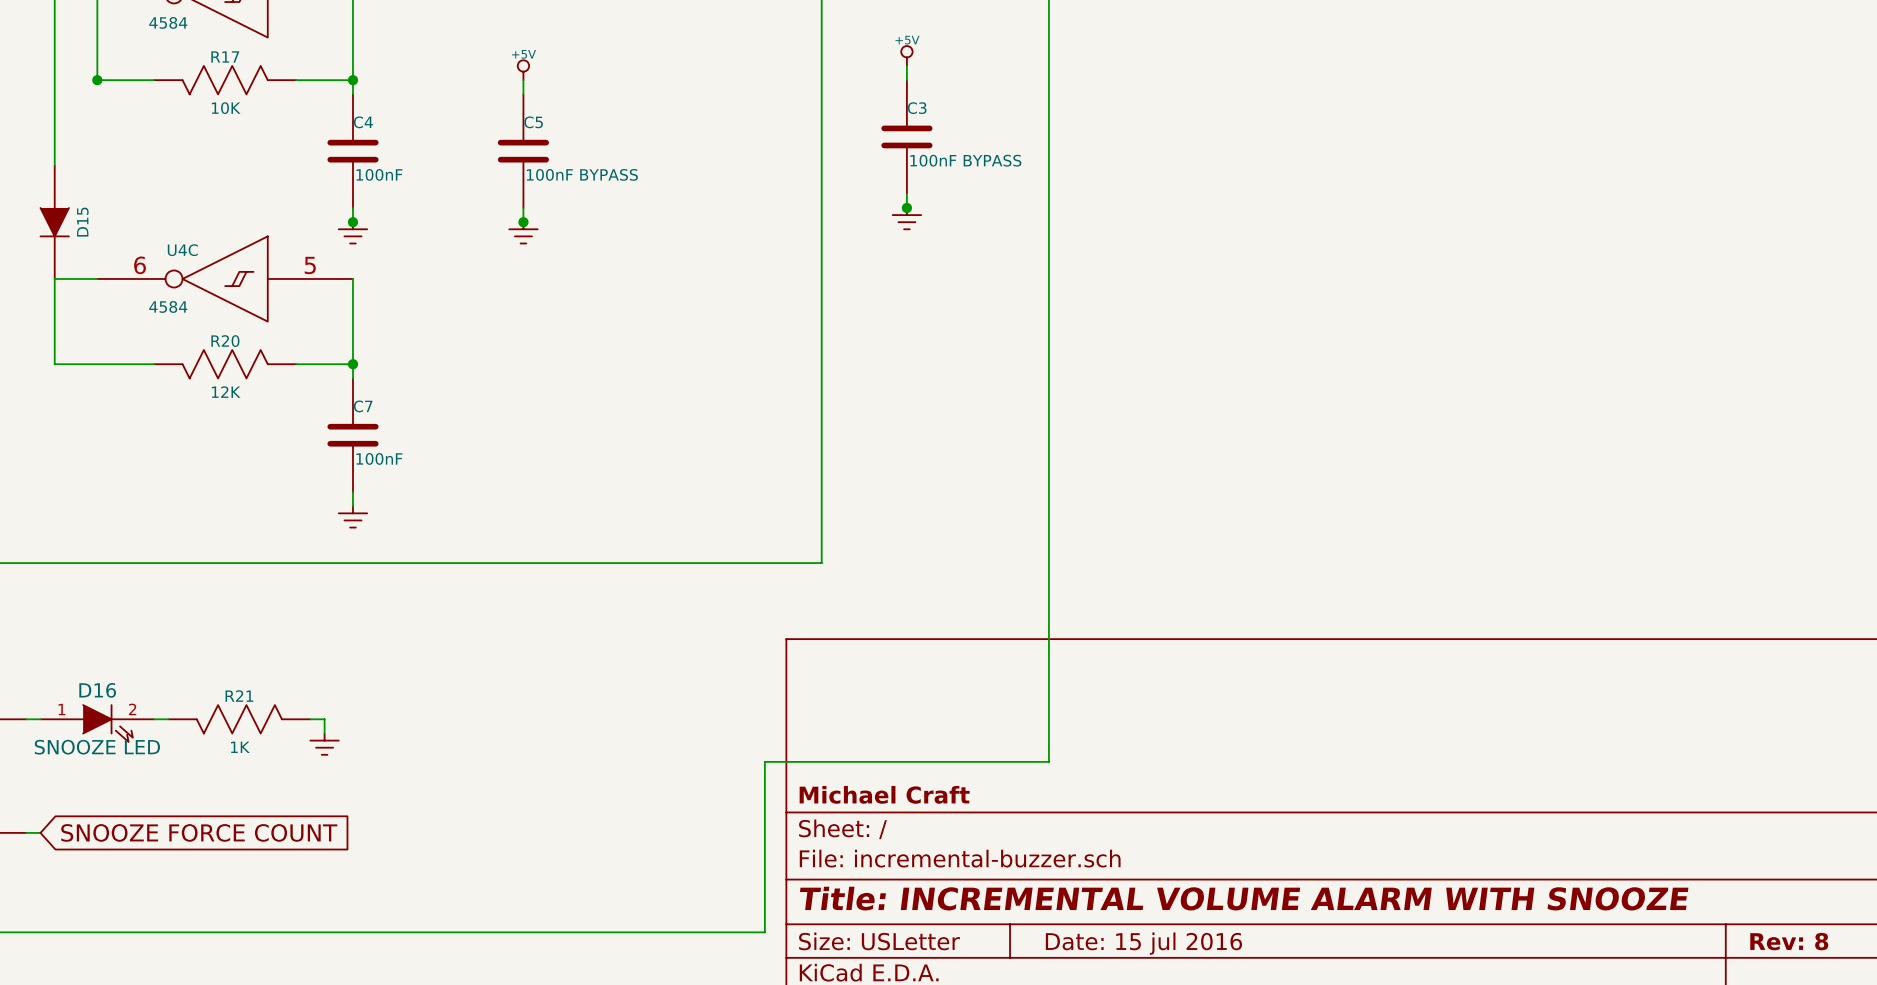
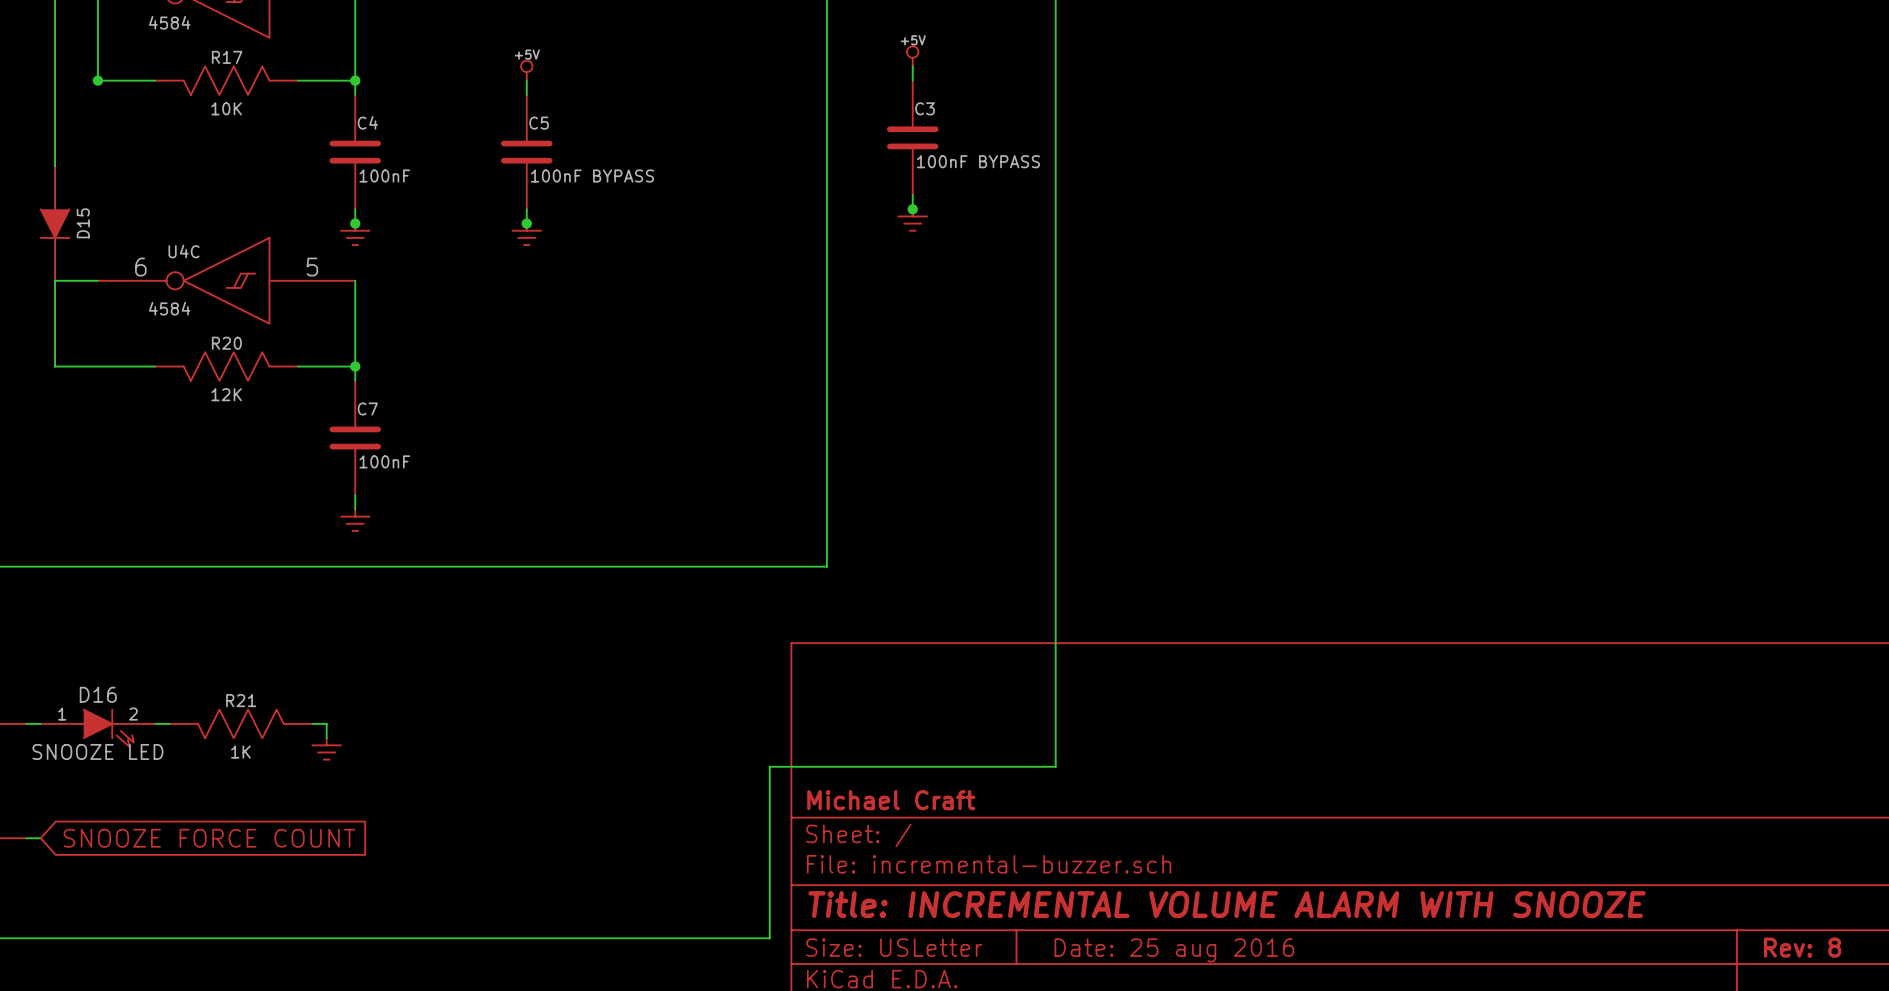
title block: Date: 15 jul 2016 (1143, 943) -> Date: 25 aug 2016 (1174, 950)

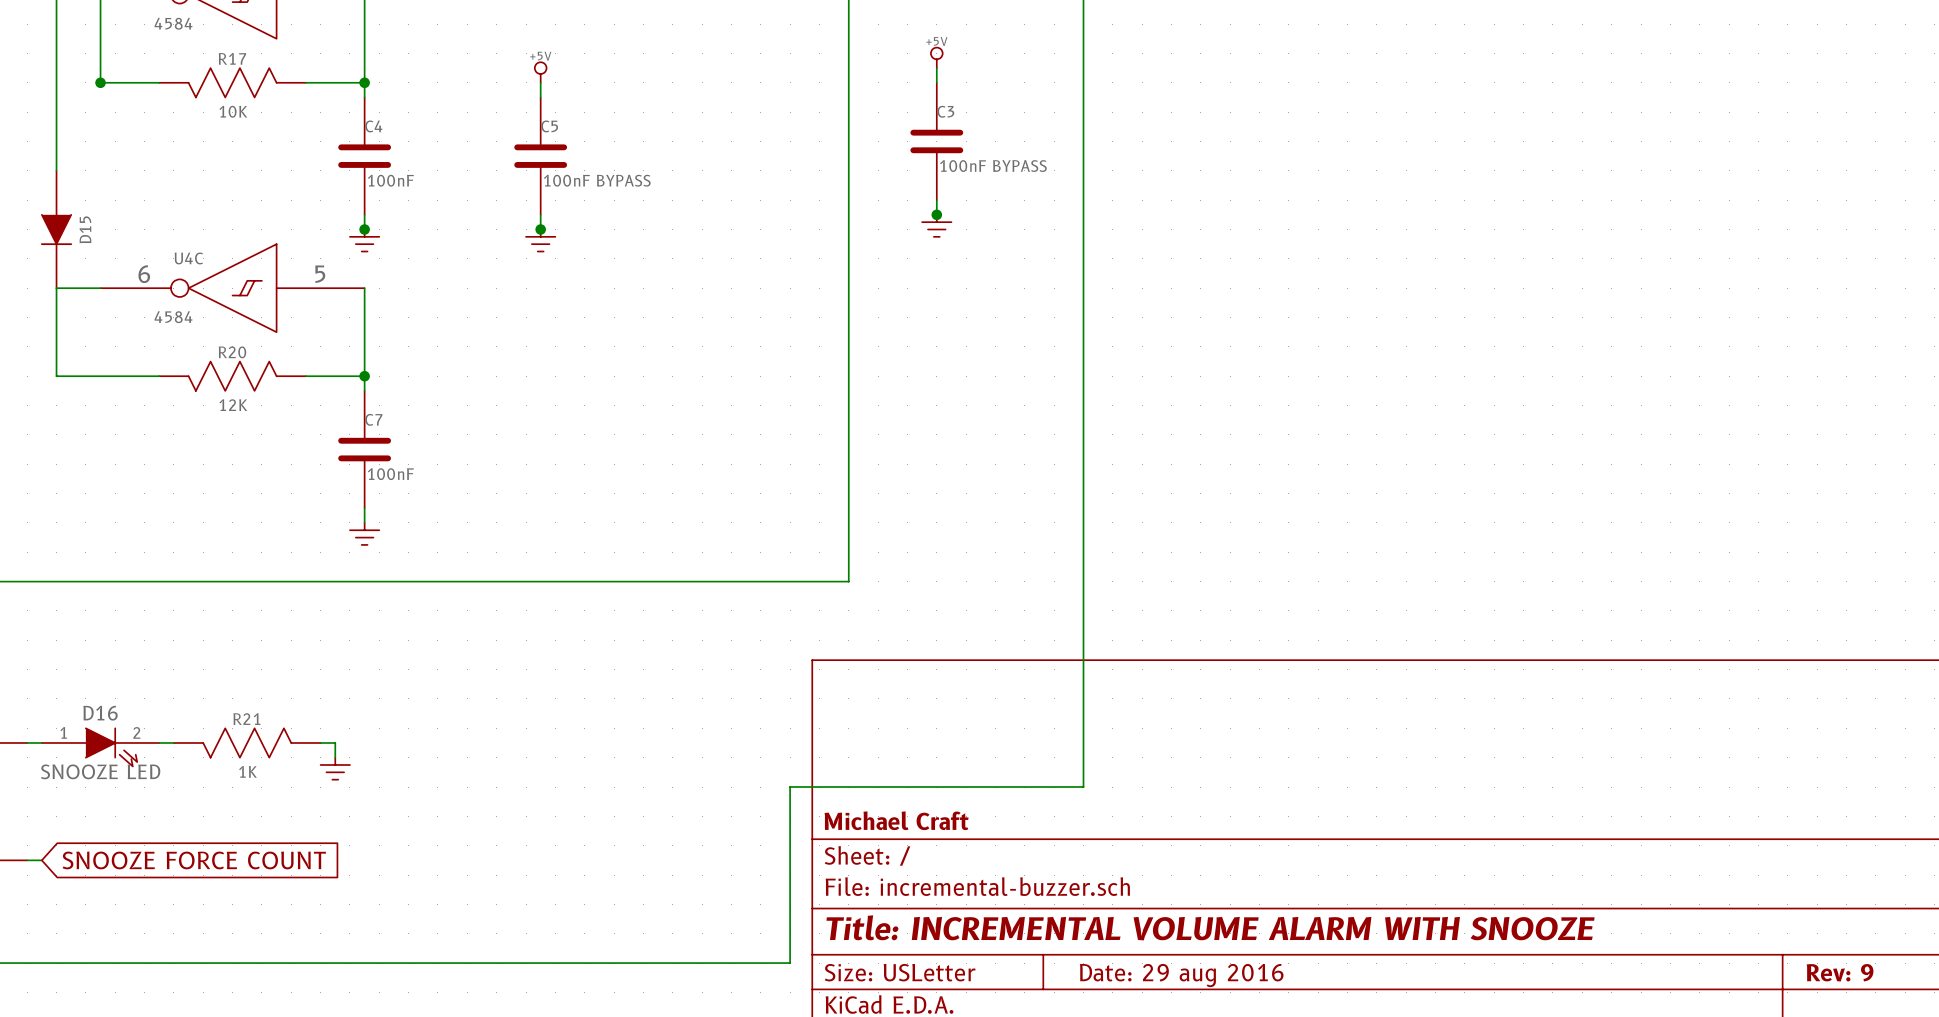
title block: Rev: 8 (1802, 947) -> Rev: 9 (1840, 972)
title block: Date: 25 aug 2016 (1174, 950) -> Date: 29 aug 2016 (1181, 975)

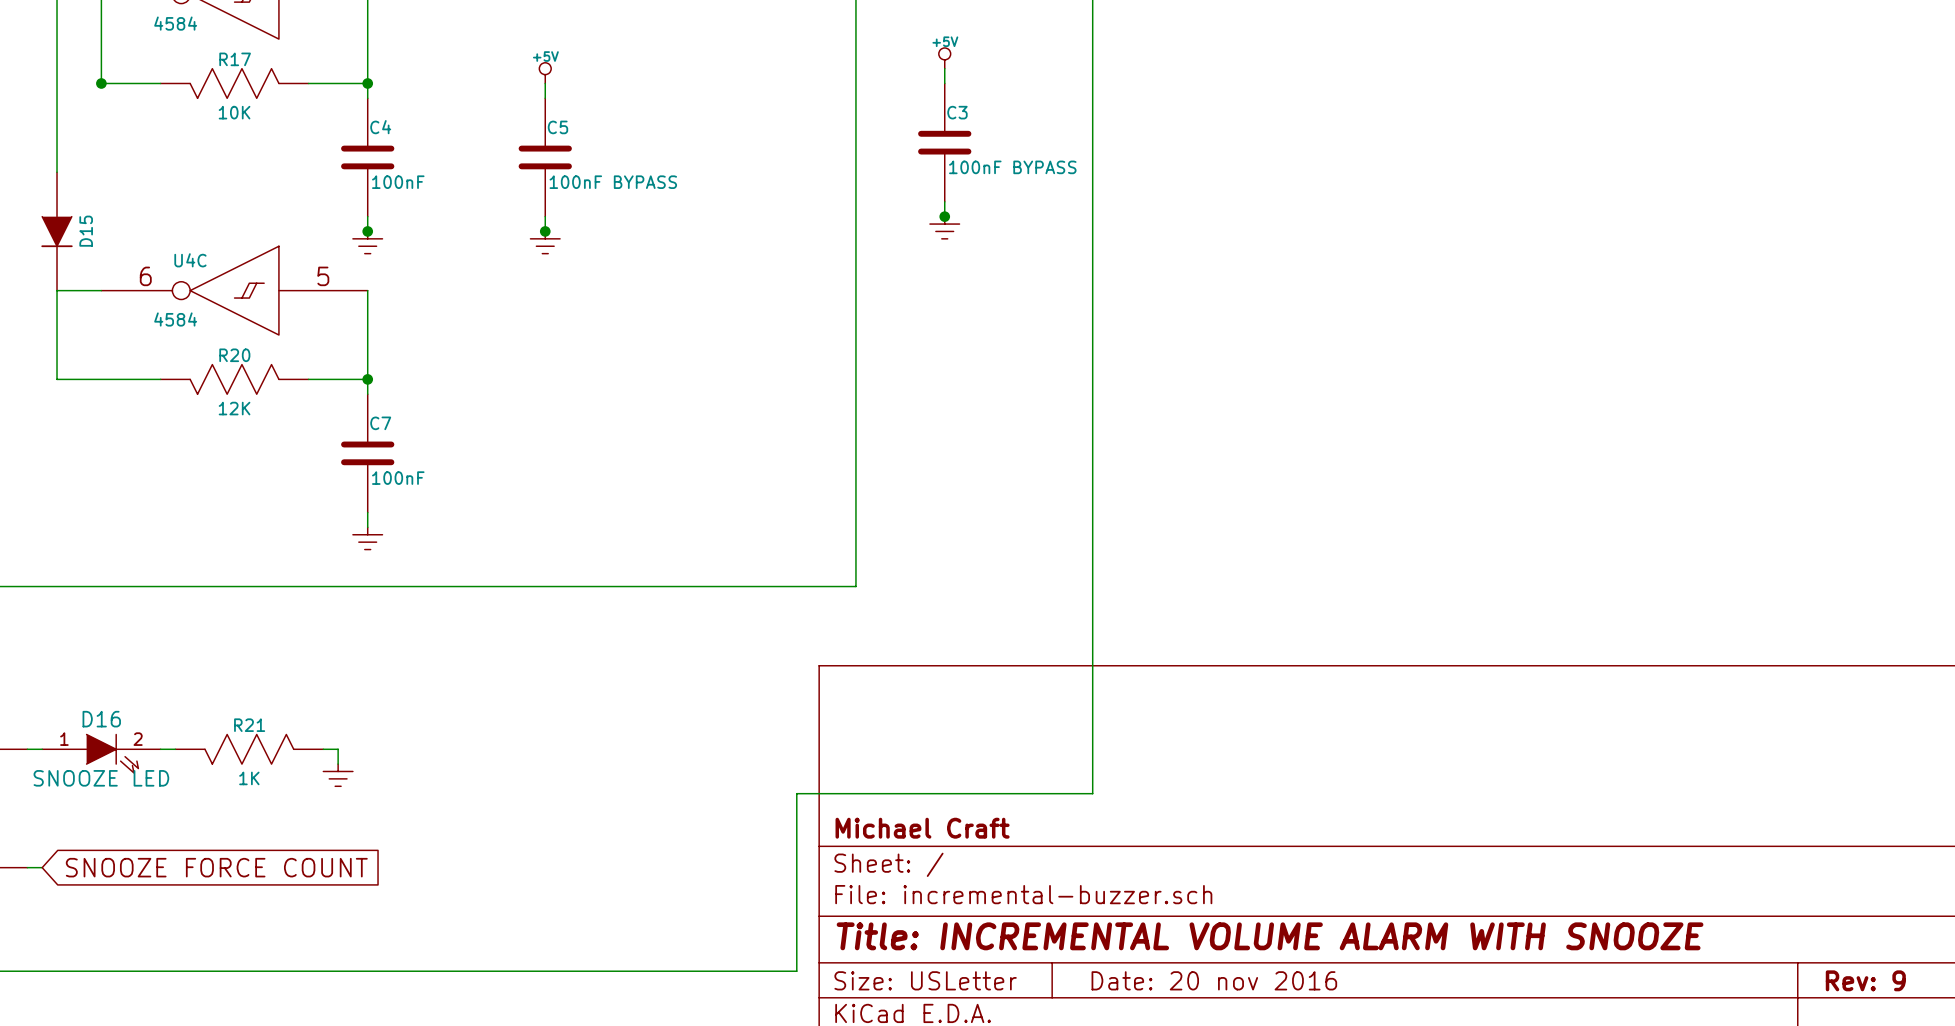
title block: Date: 29 aug 2016 (1181, 975) -> Date: 20 nov 2016 (1214, 980)

